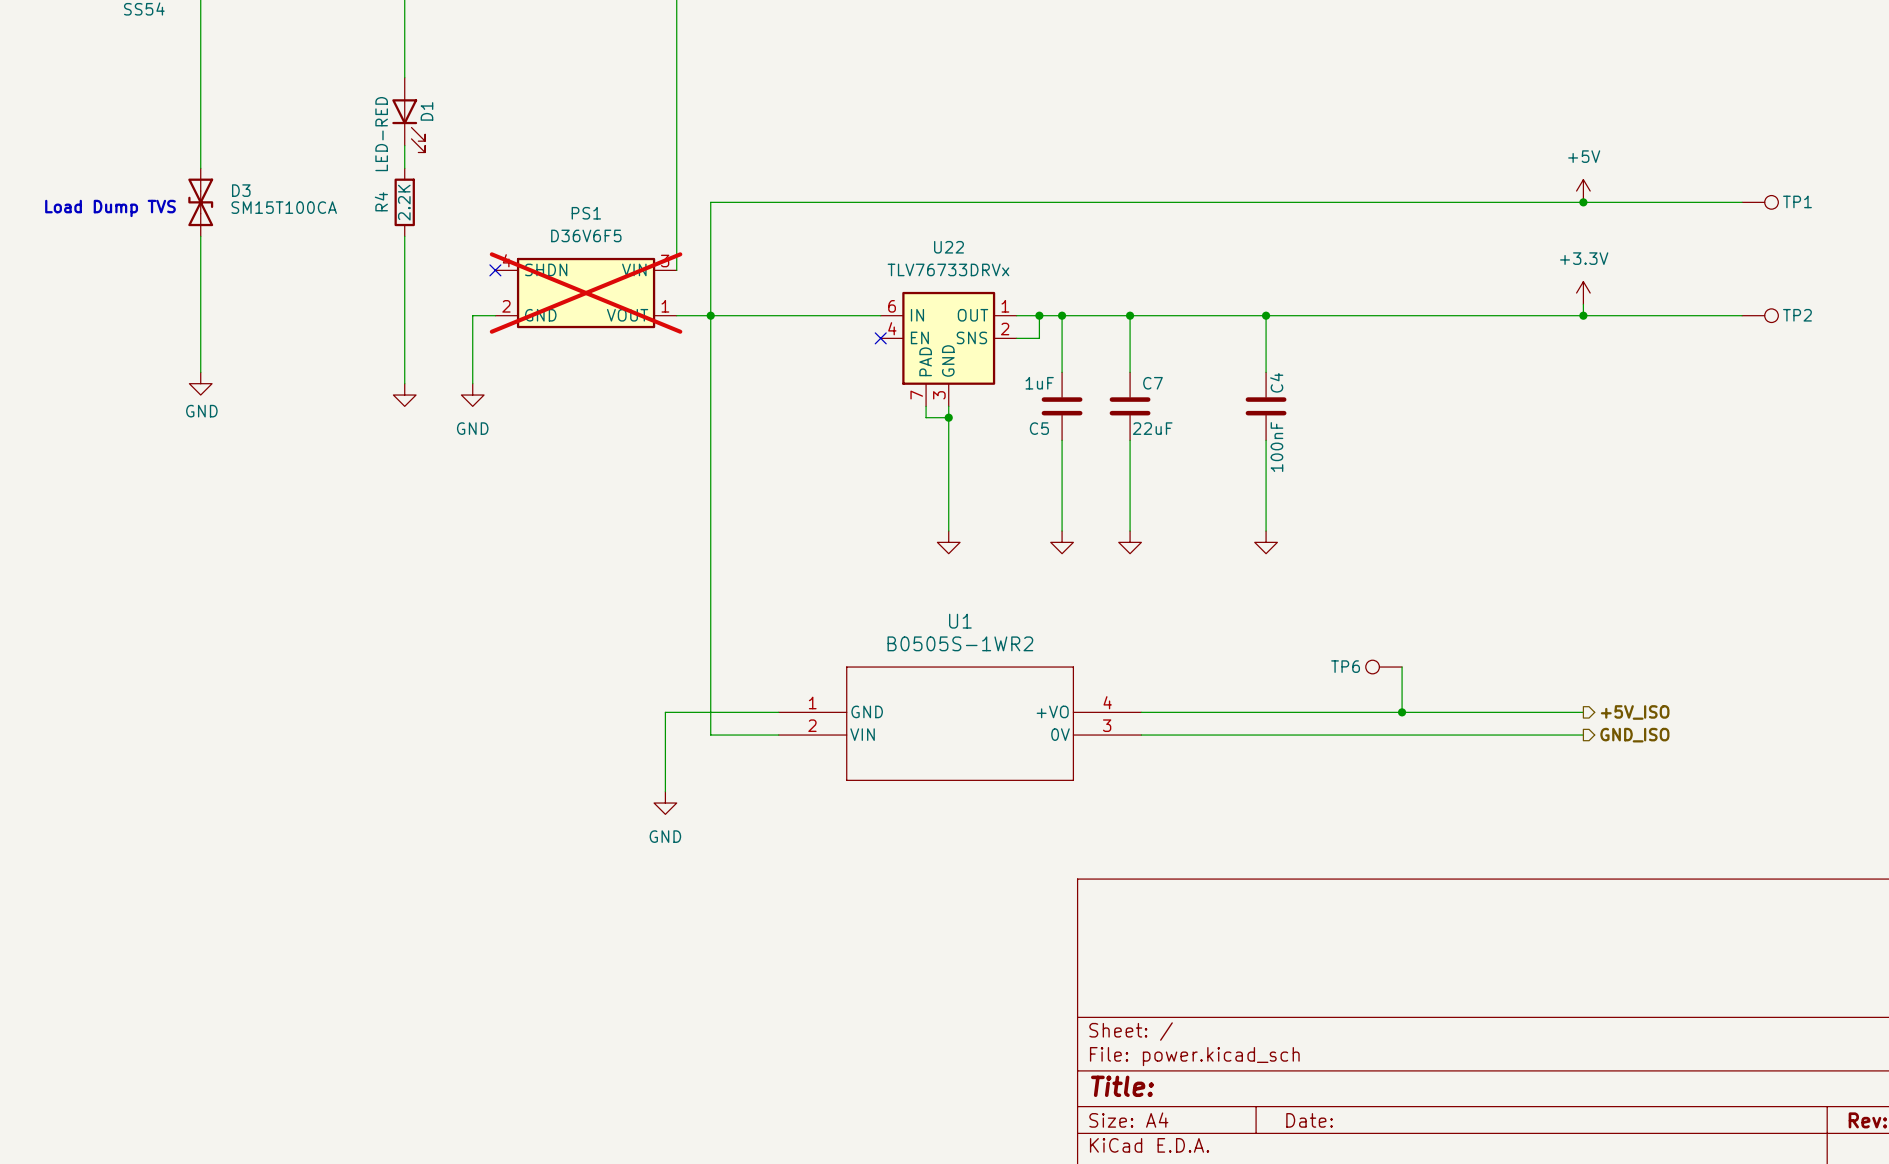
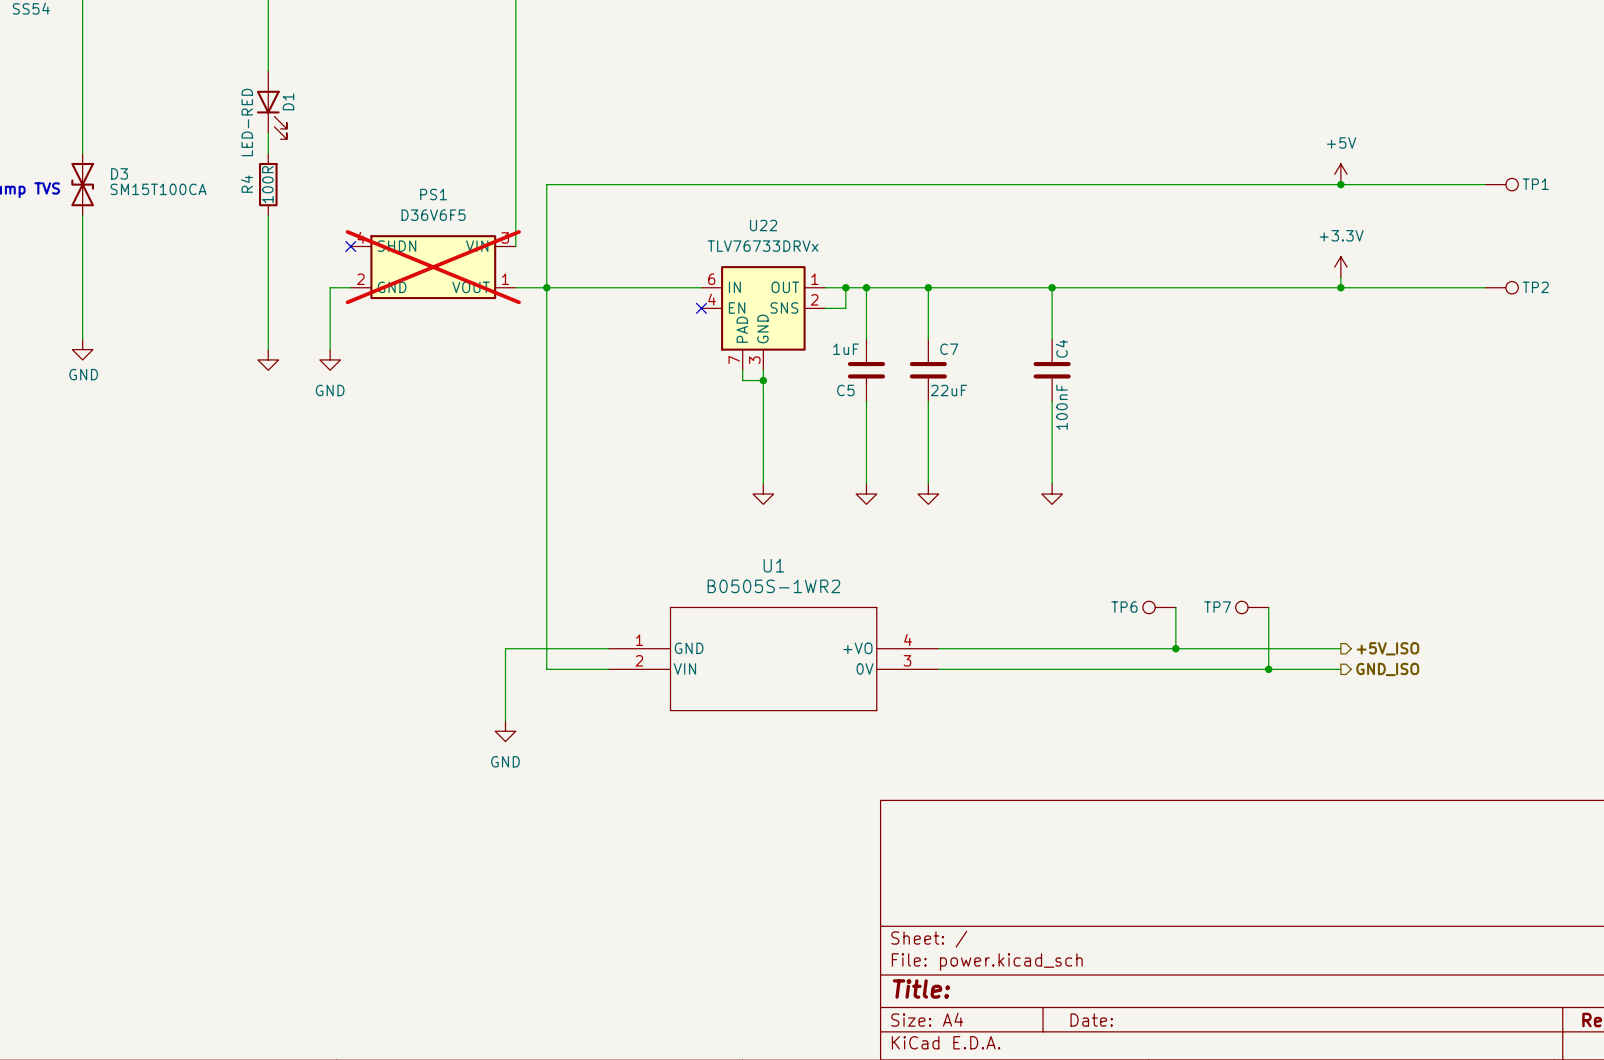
R4 value: 2.2K (404, 202) -> 100R (267, 184)
TP7: none -> (1252, 607)
wire: none -> (1268, 607) (1268, 669)
junction: none -> (1268, 669)

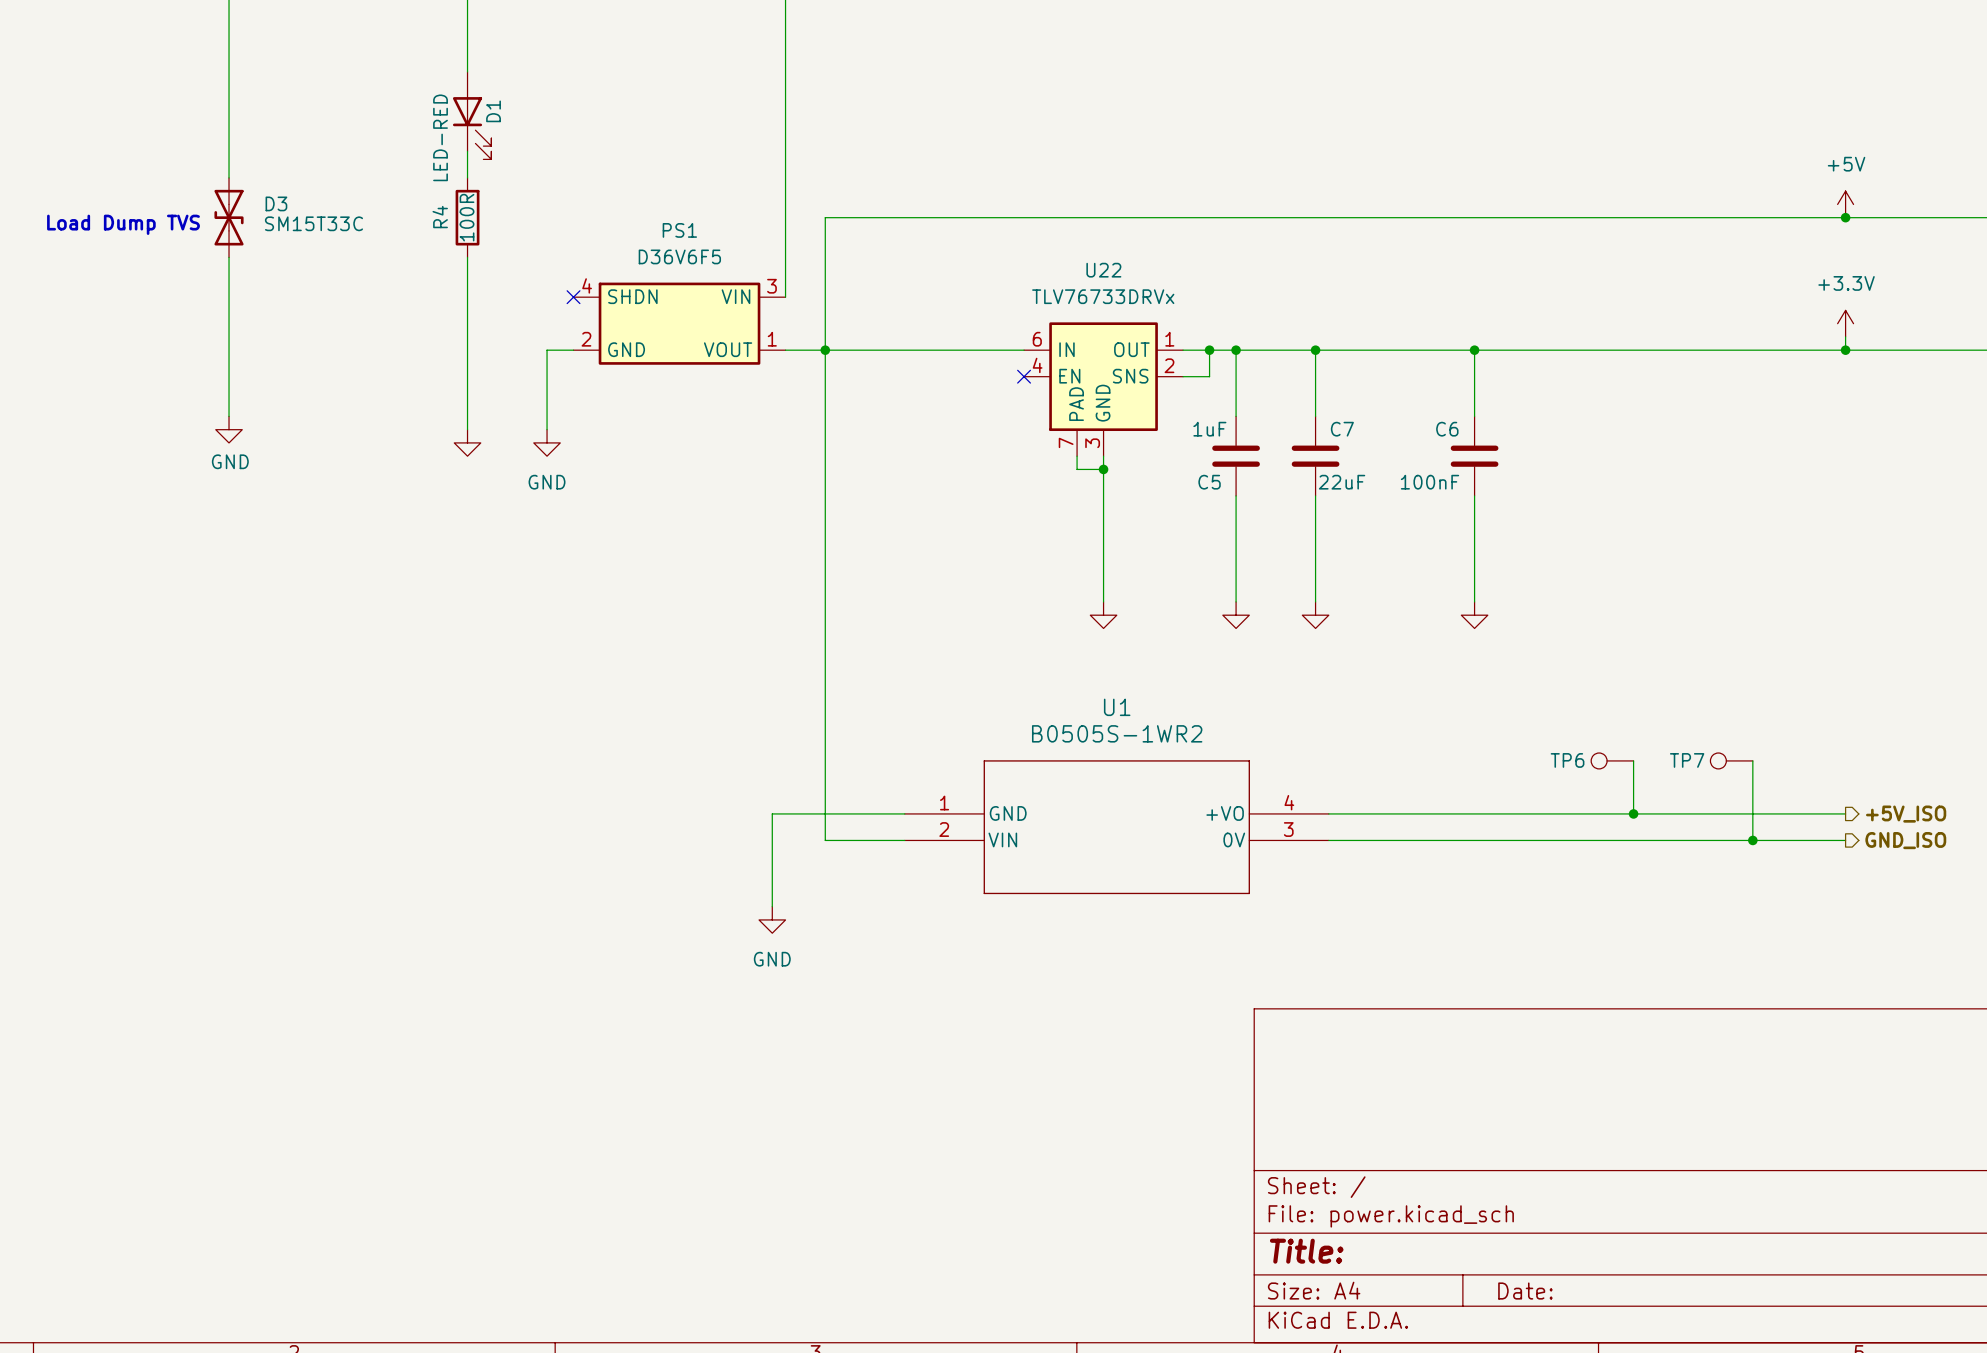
D3 value: SM15T100CA (158, 189) -> SM15T33C (313, 223)
PS1 do-not-place cross: (433, 267) -> none
C4 name: C4 (1061, 348) -> C6 (1447, 429)
C4 value rotation: 0° (1062, 407) -> 90° clockwise (1429, 482)

